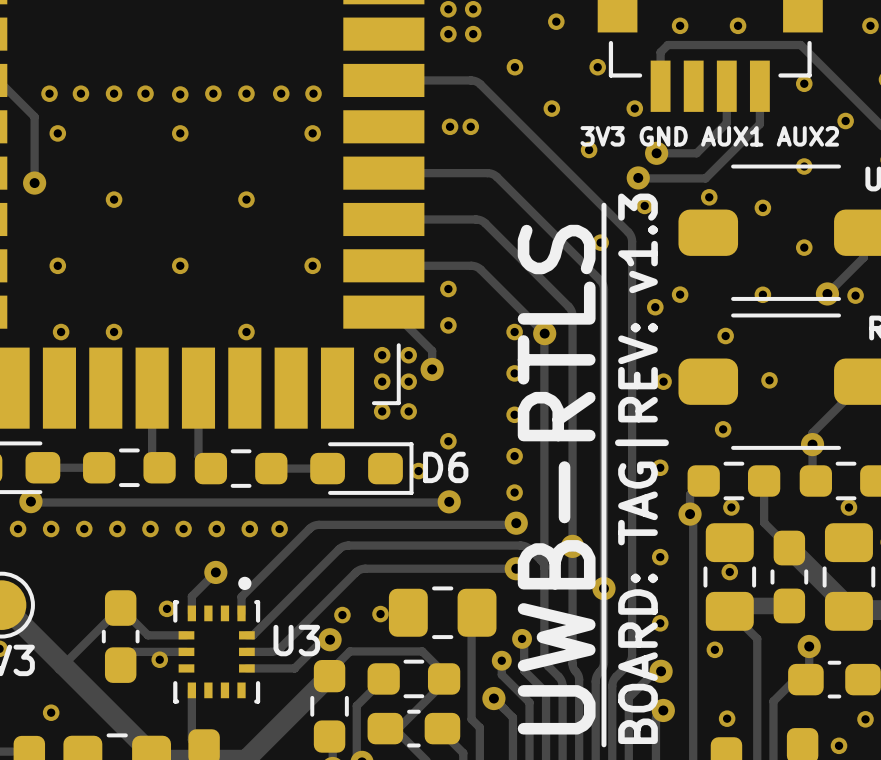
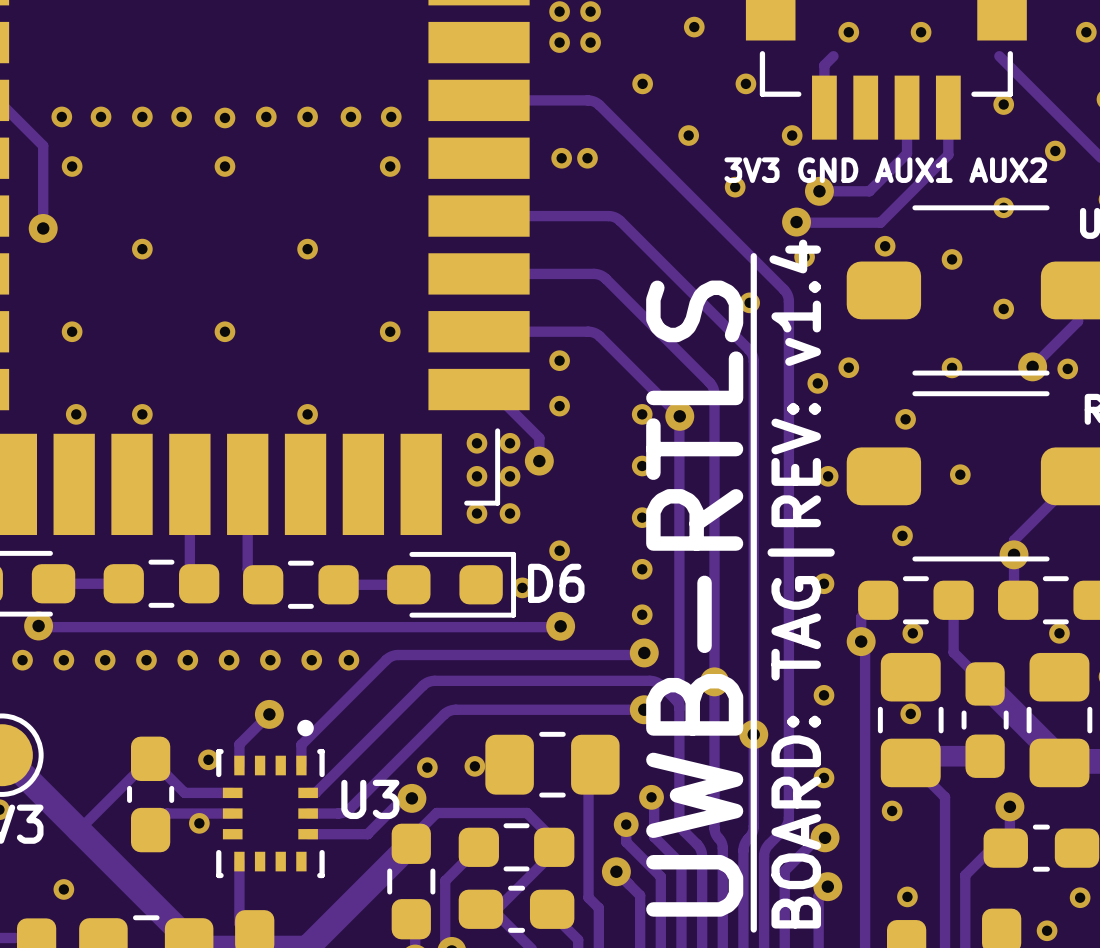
track: (667, 45) (800, 45) -> none
text: BOARD: TAG|REV: v1.3 (641, 468) -> BOARD: TAG|REV: v1.4 (801, 584)

